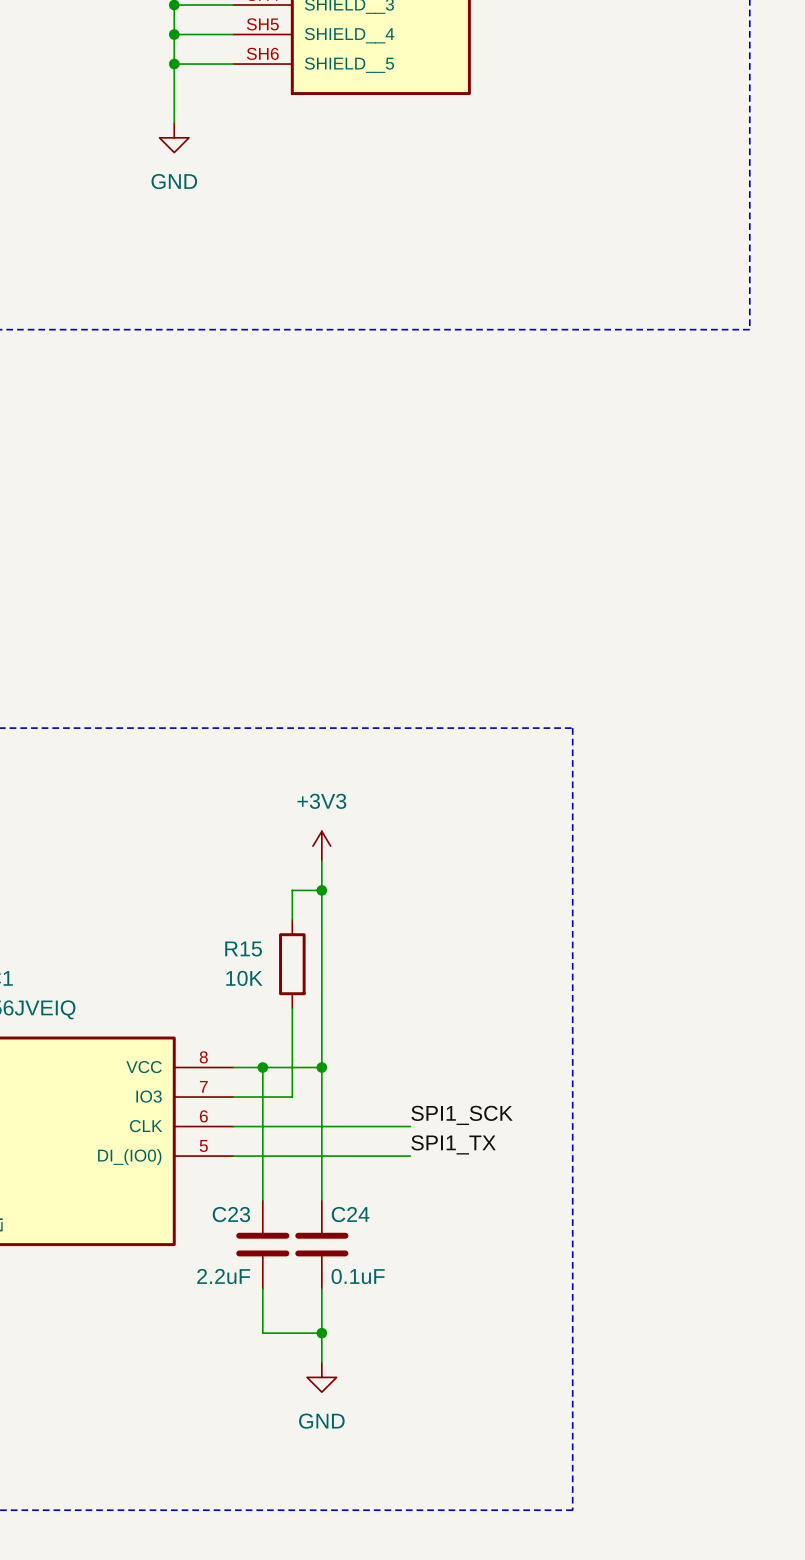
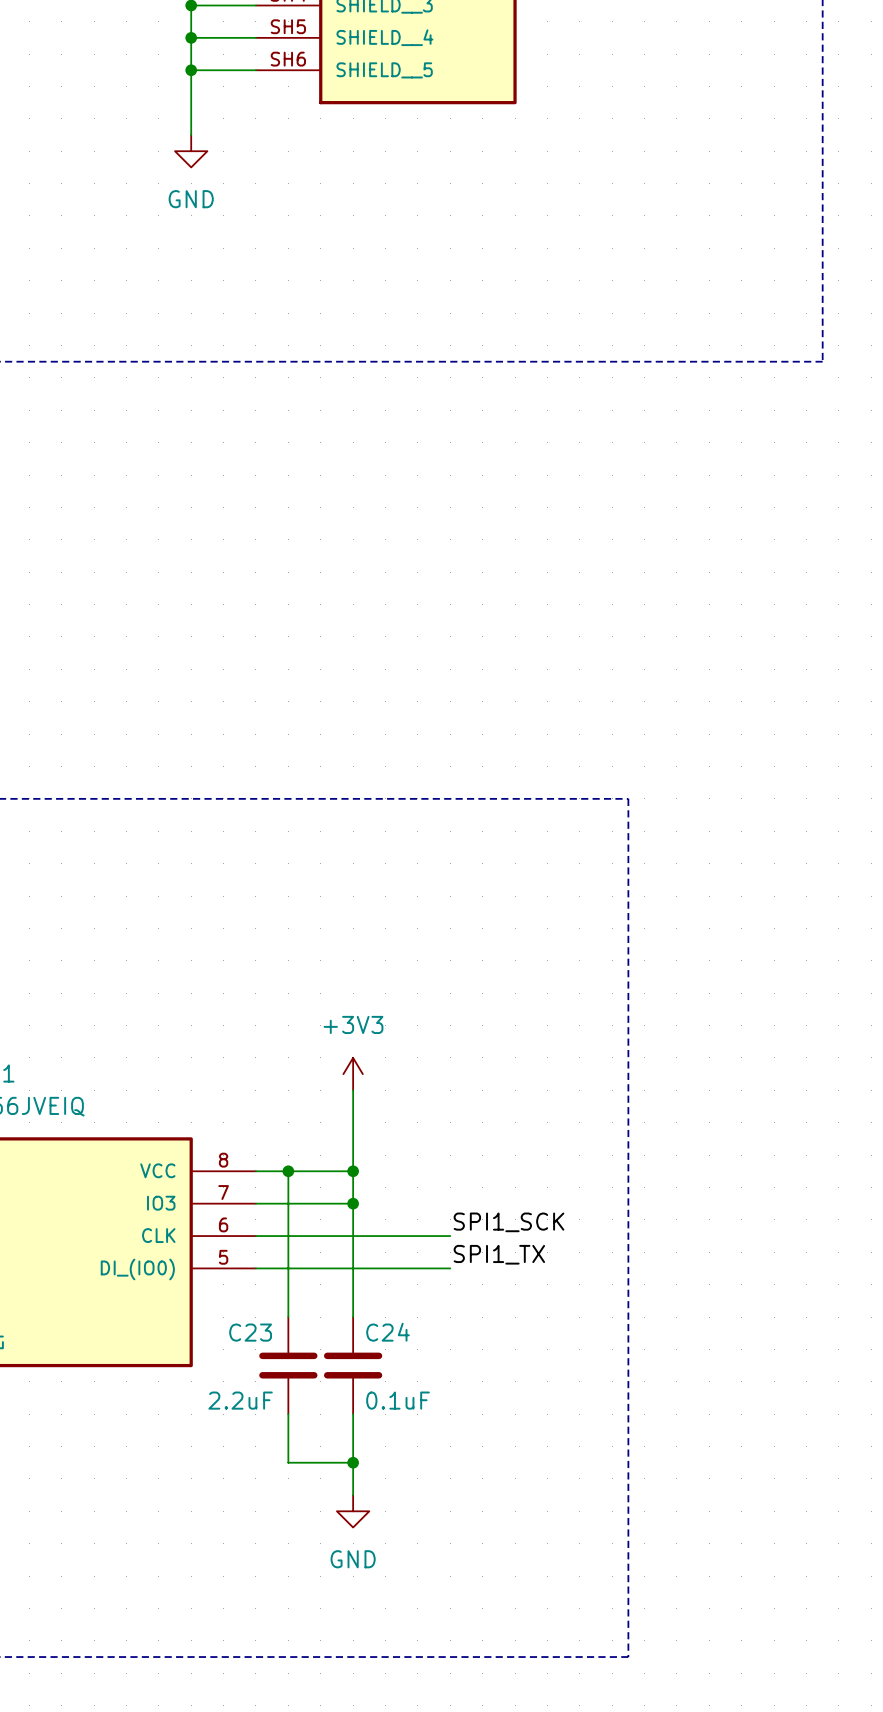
power symbol position: +3V3 (321, 846) -> +3V3 (353, 1074)
wire: (321, 860) (321, 993) -> none
wire: (321, 890) (292, 890) (292, 919) -> none
junction: (321, 890) -> none
R15: 10K (292, 964) -> none
wire: (292, 1008) (292, 1097) -> (353, 1203) (320, 1203)
junction: none -> (353, 1203)

